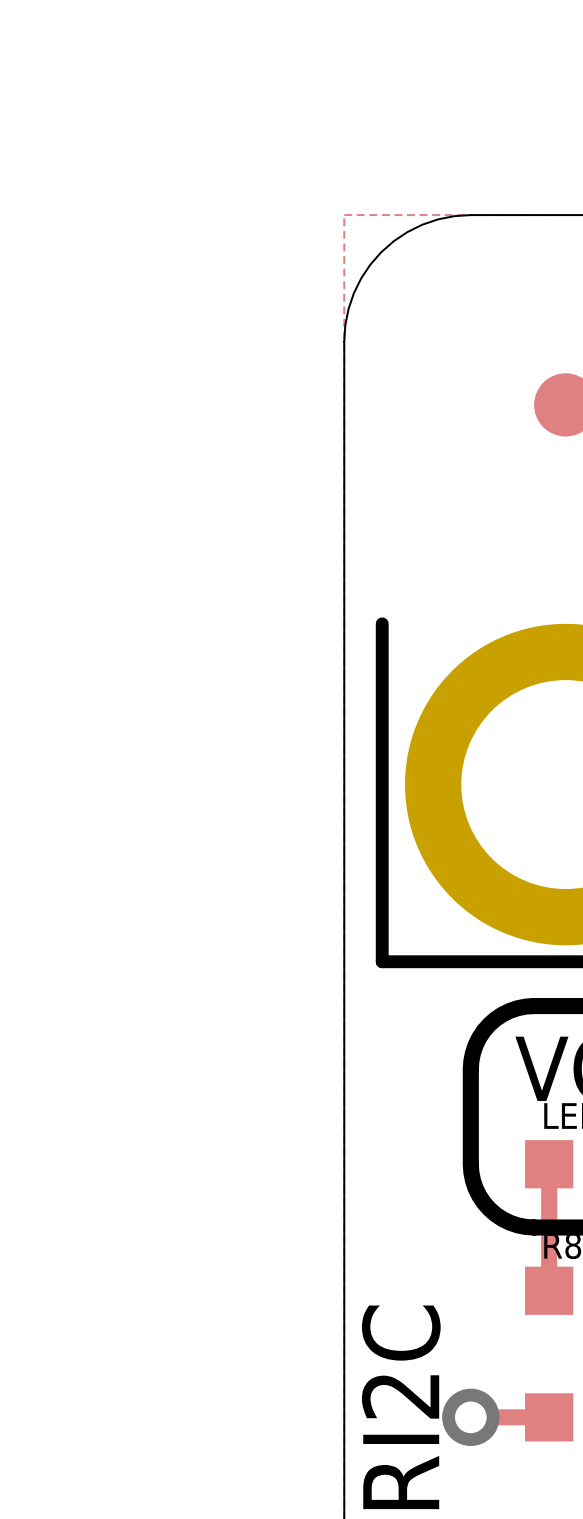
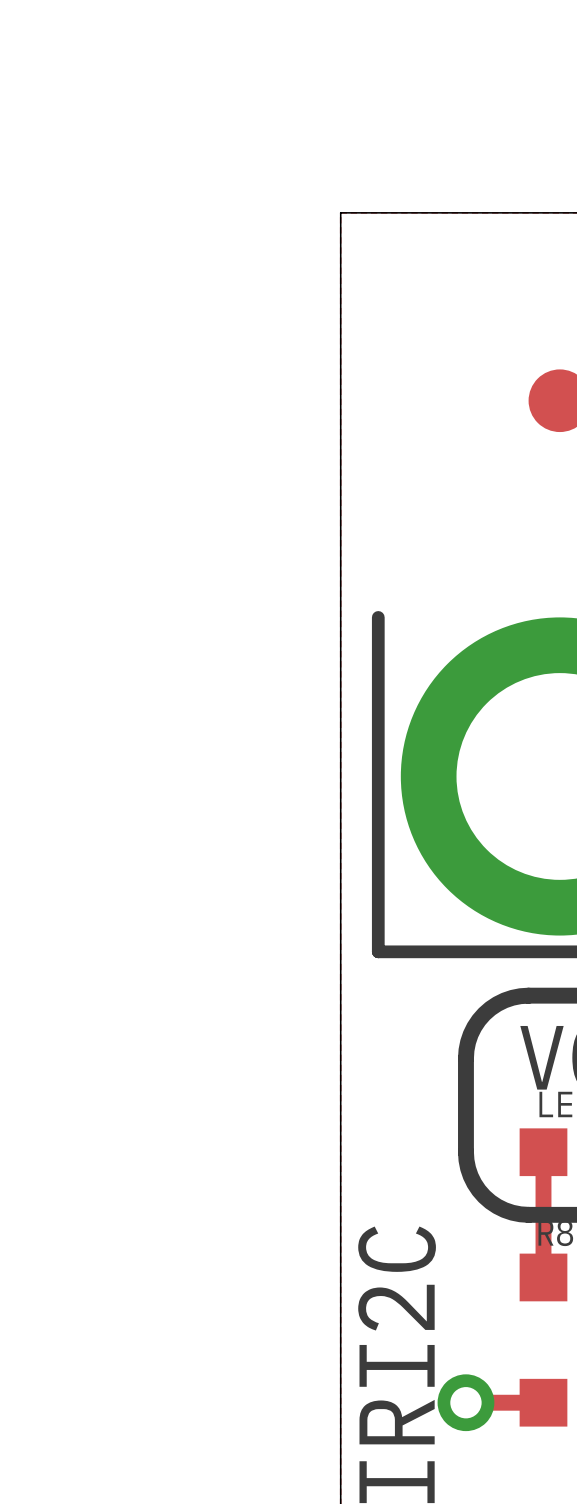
board edge: (470, 215) (438, 219) (422, 224) (407, 232) (381, 252) (361, 278) (353, 293) (348, 308) (344, 341) -> (465, 212) (340, 212) (340, 338)

